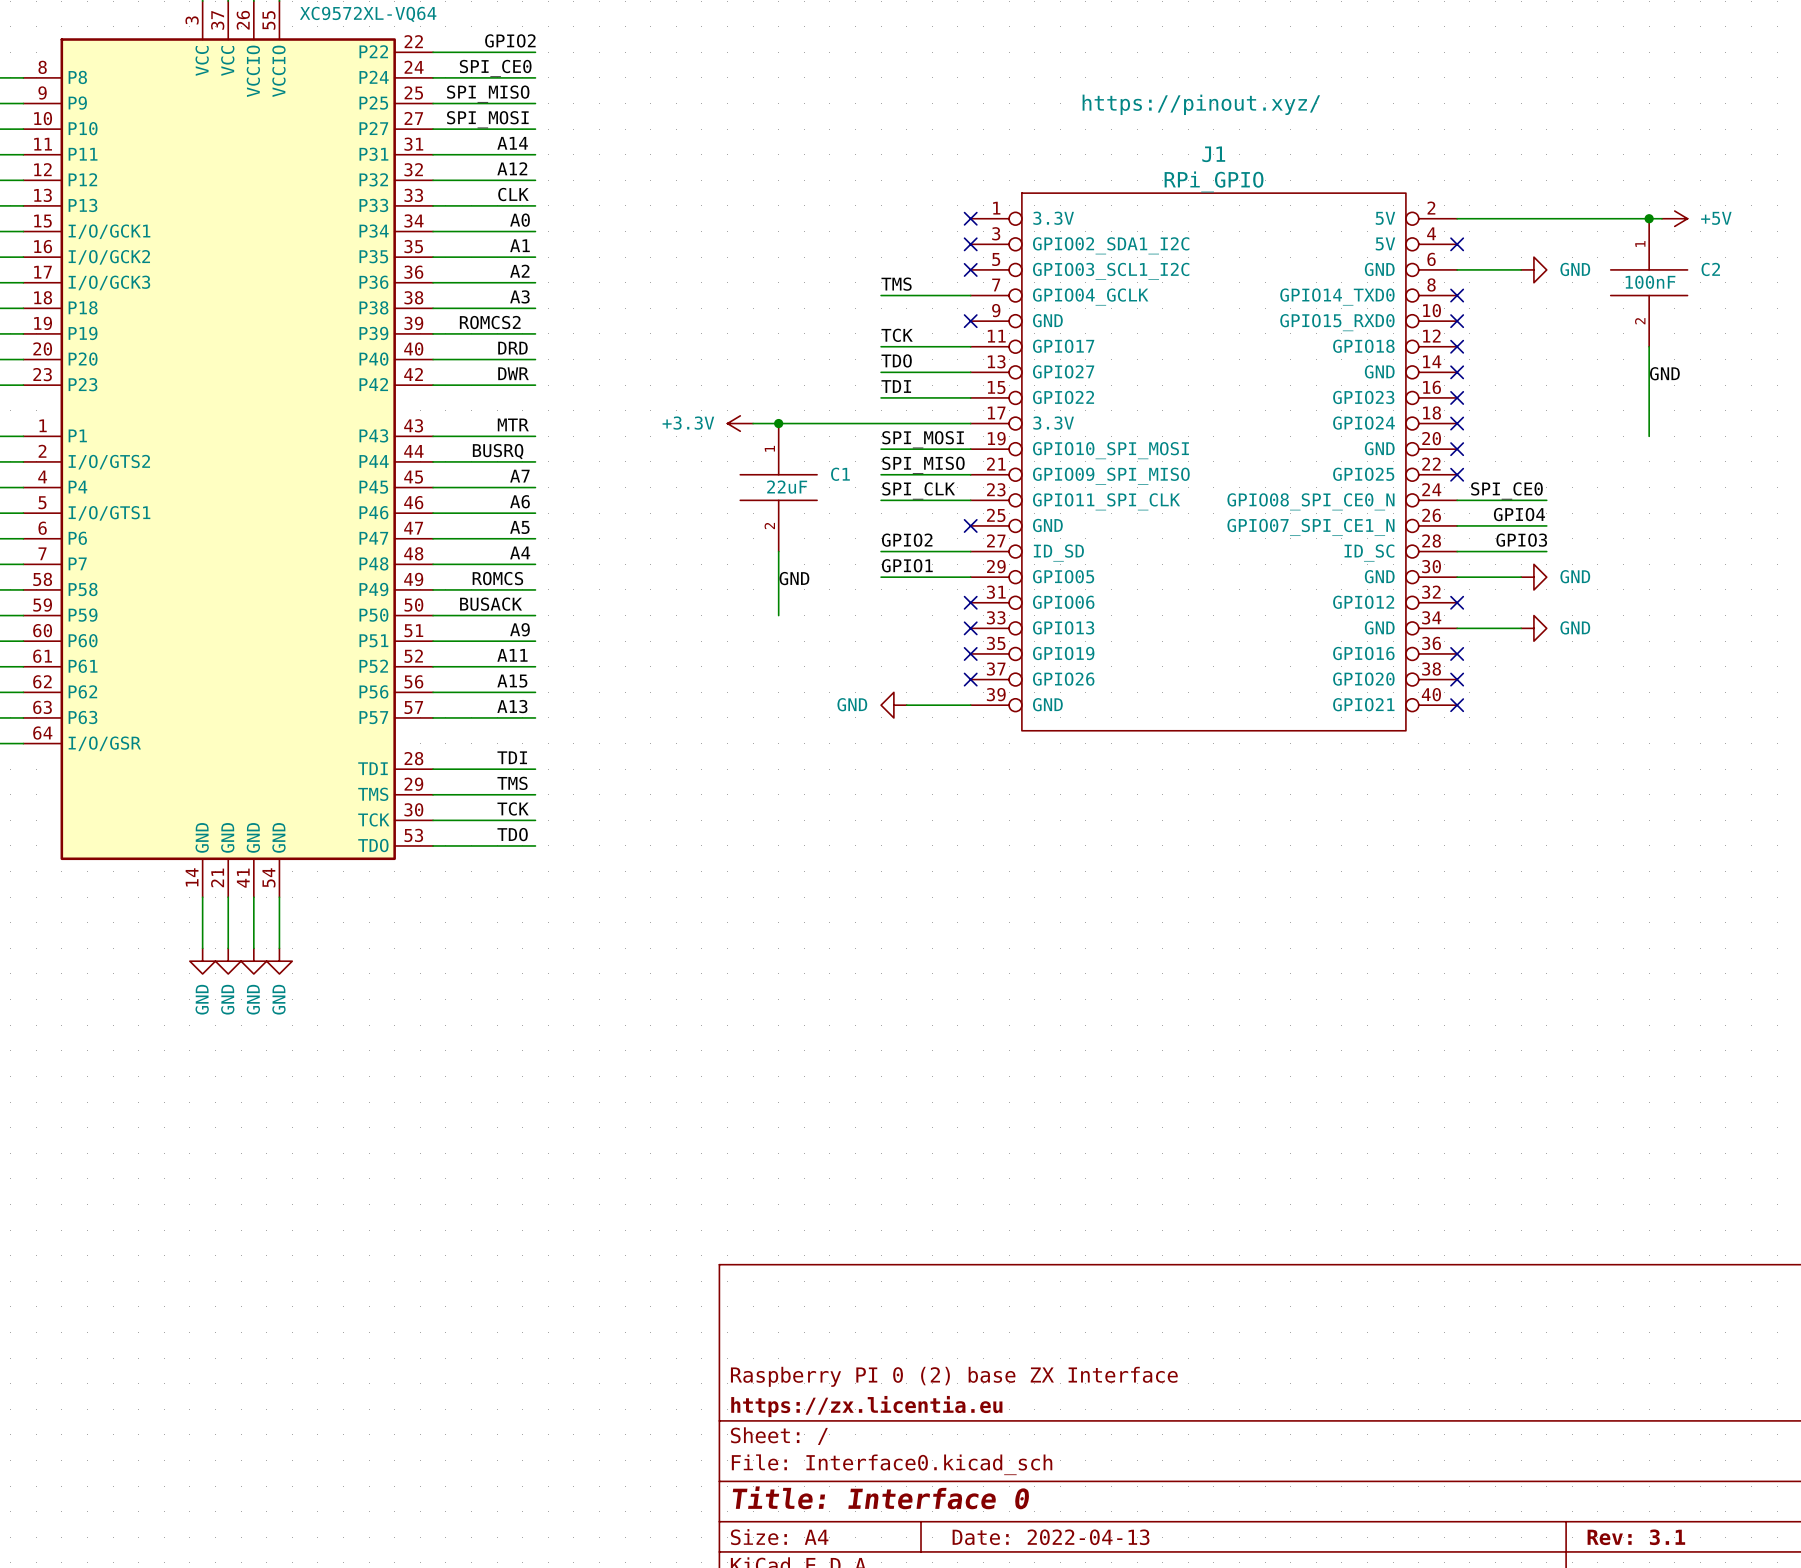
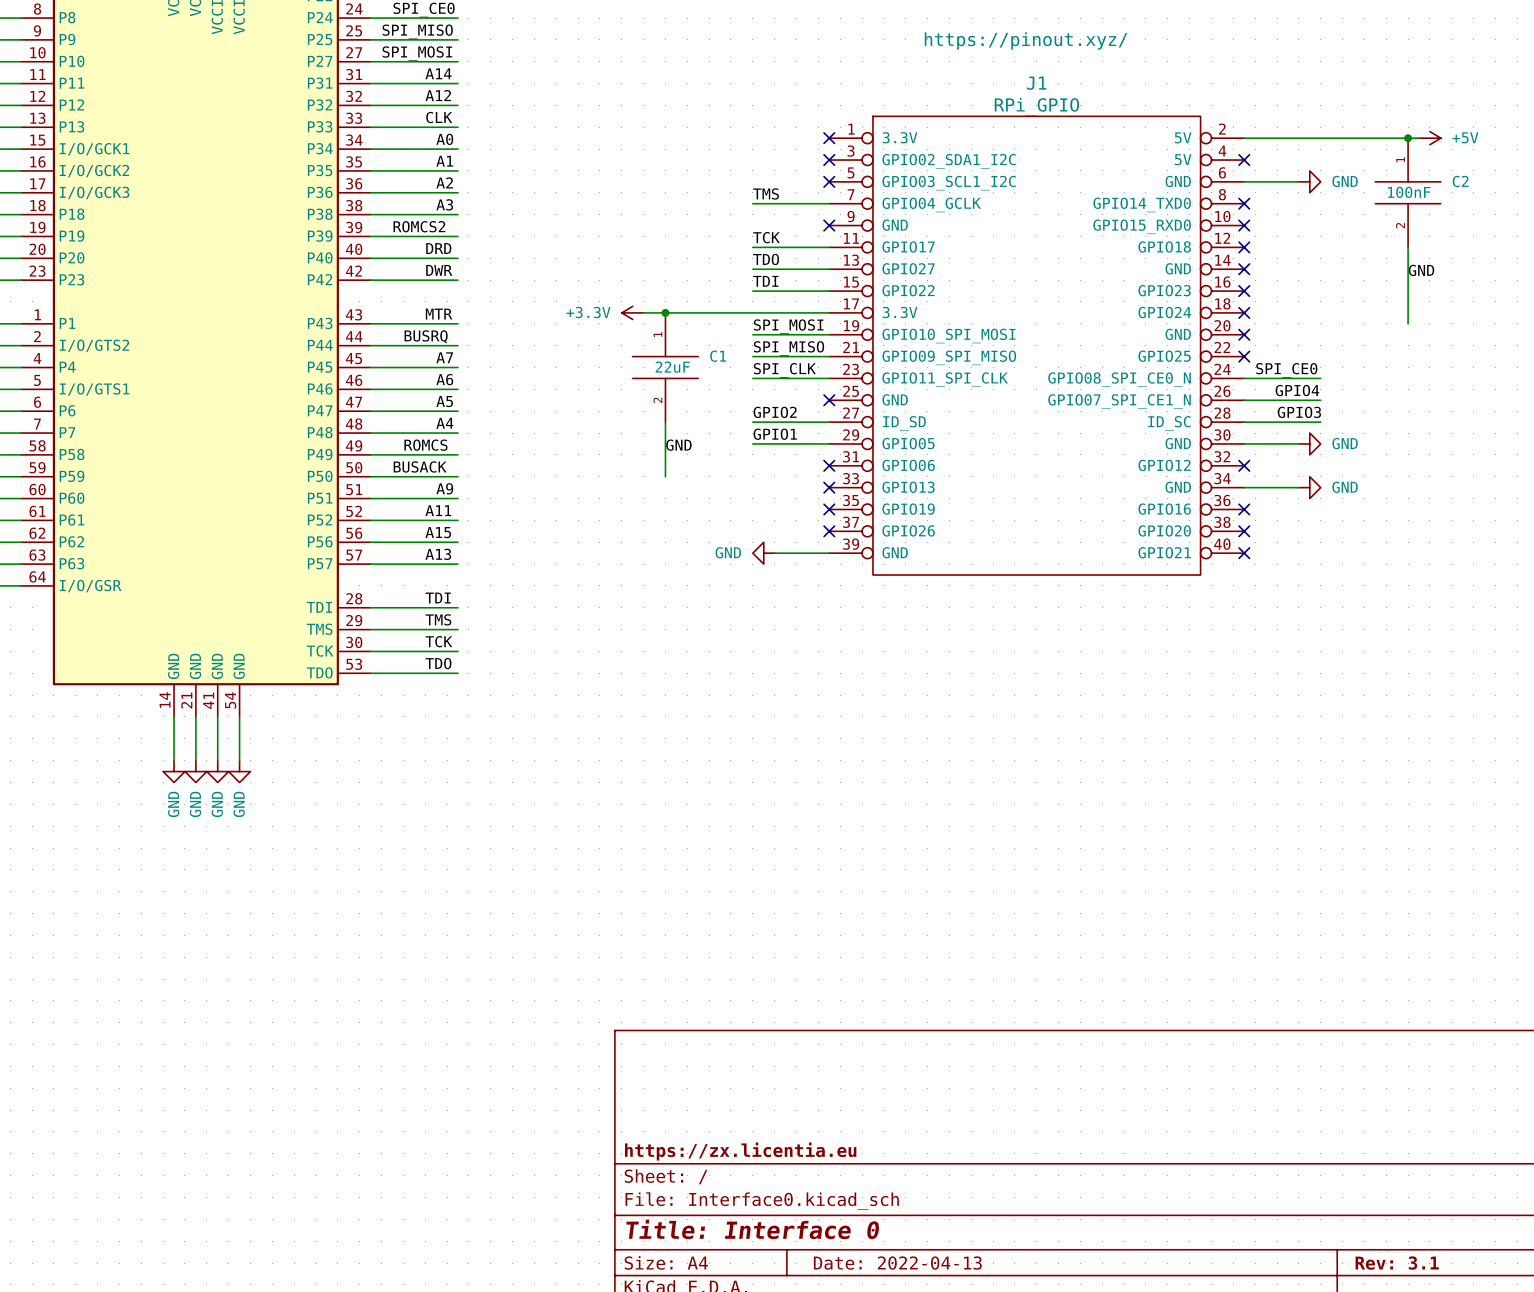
title block: Raspberry PI 0 (2) base ZX Interface (954, 1376) -> none

